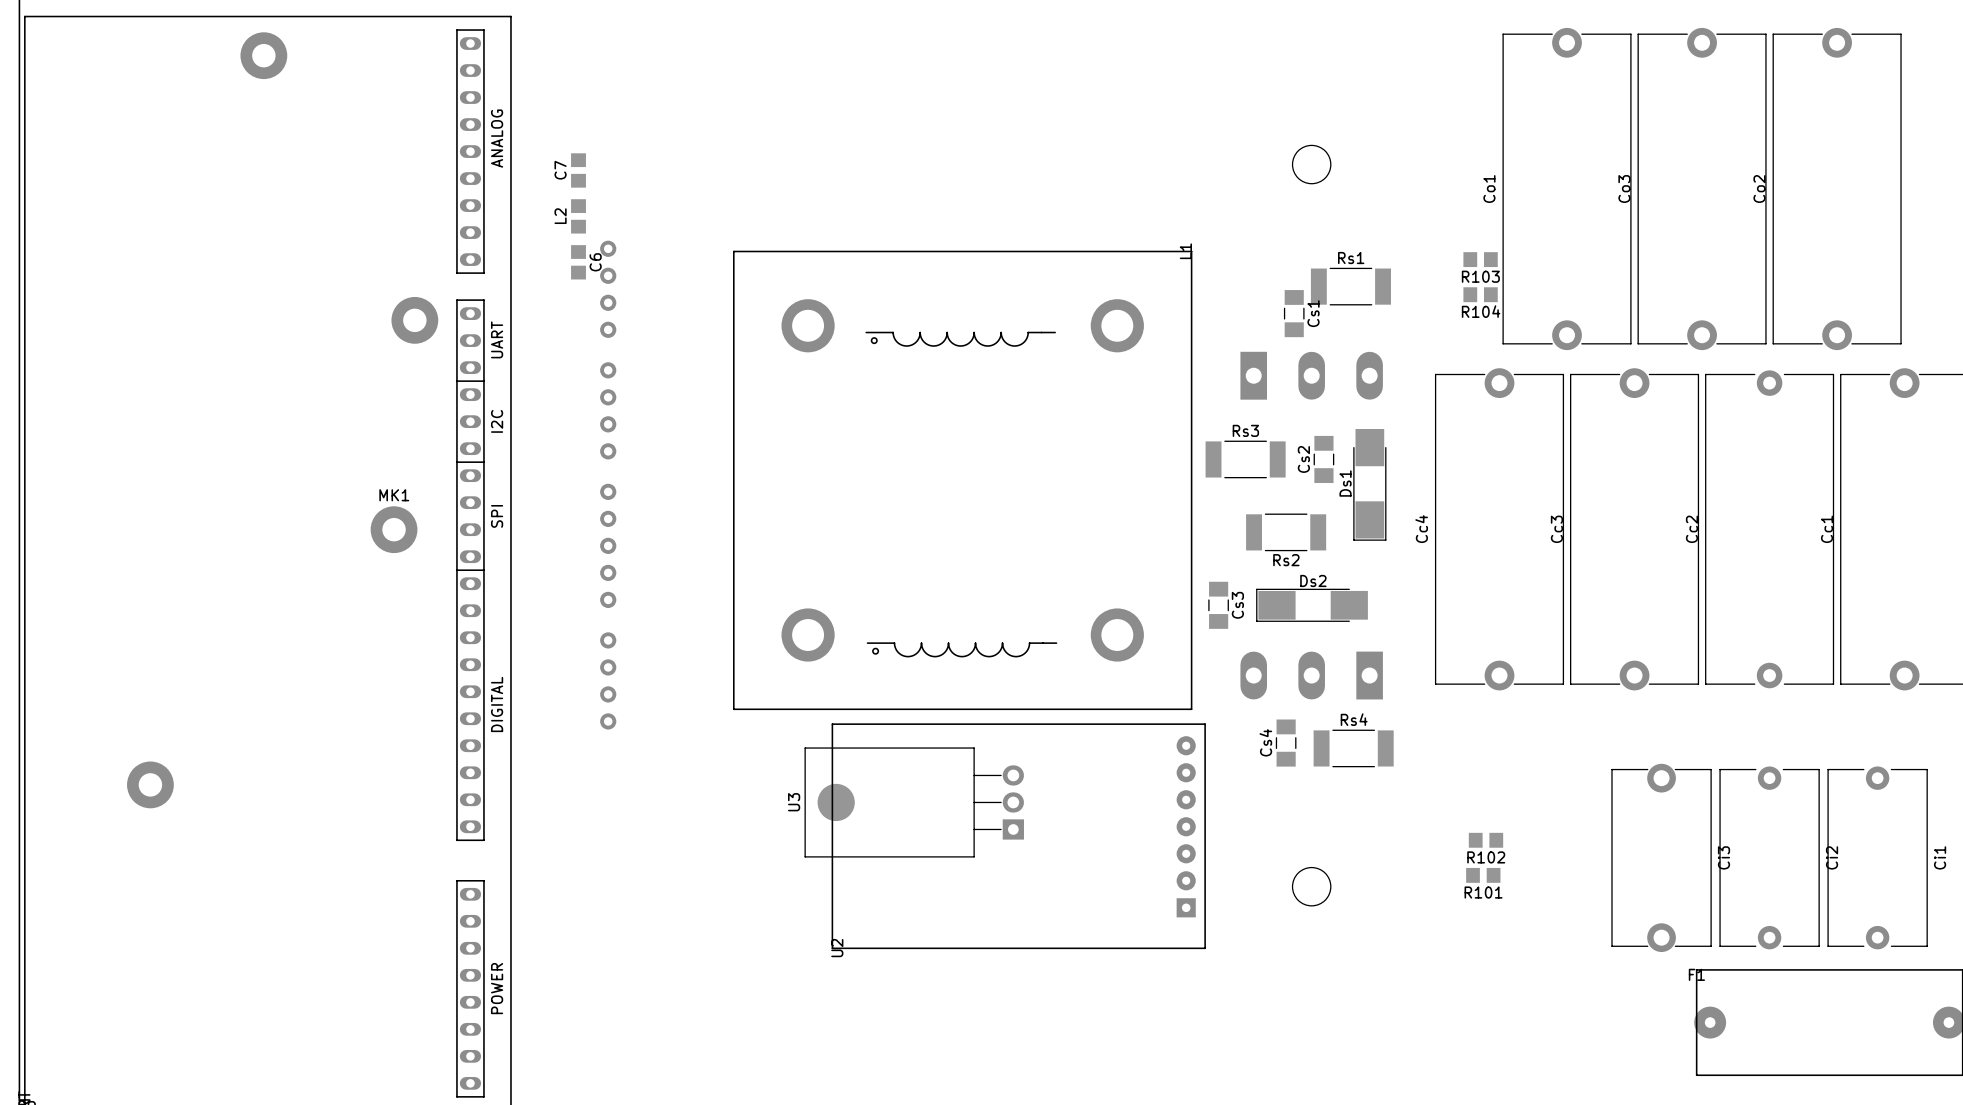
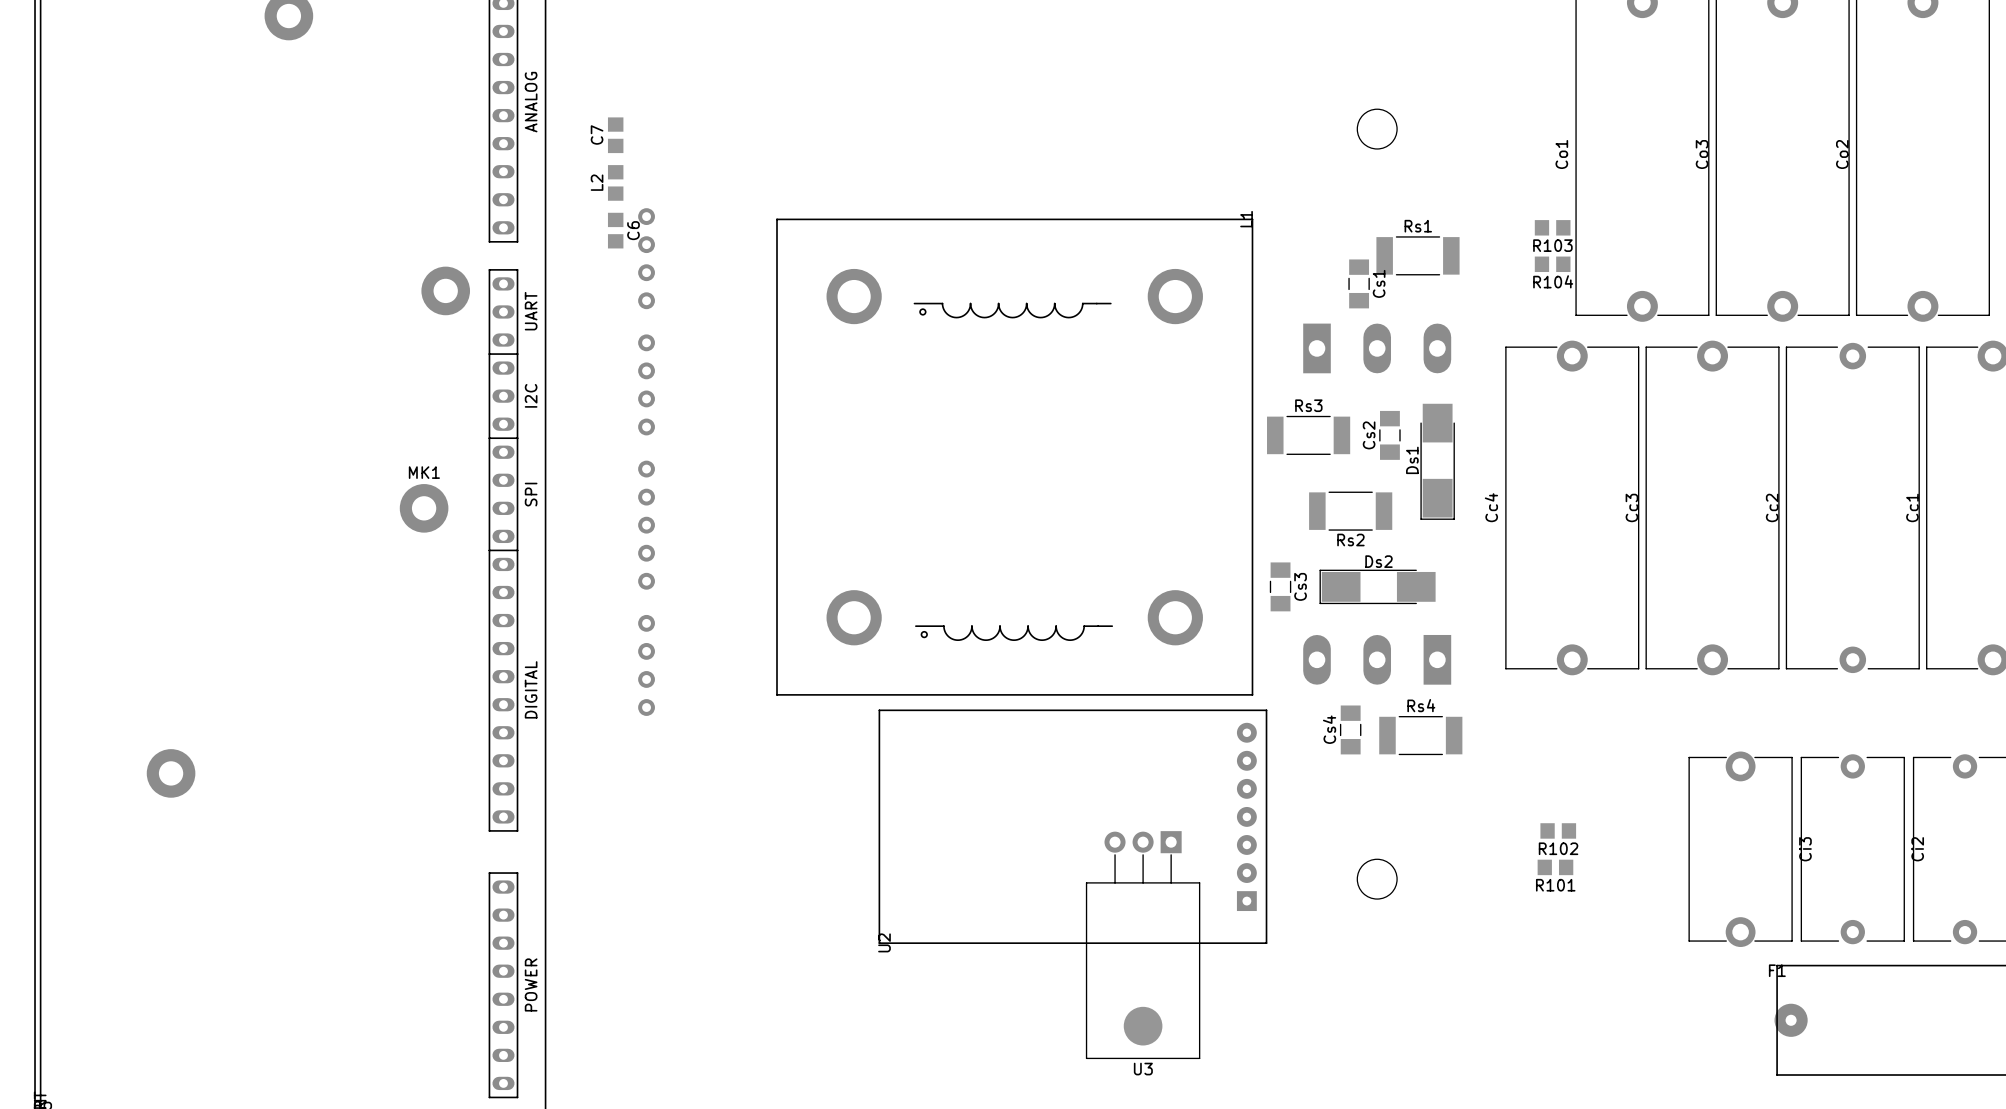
U3 footprint: [804, 747, 1024, 858] -> [1085, 831, 1201, 1060]
U3 name position: U3 (794, 802) -> U3 (1143, 1069)

